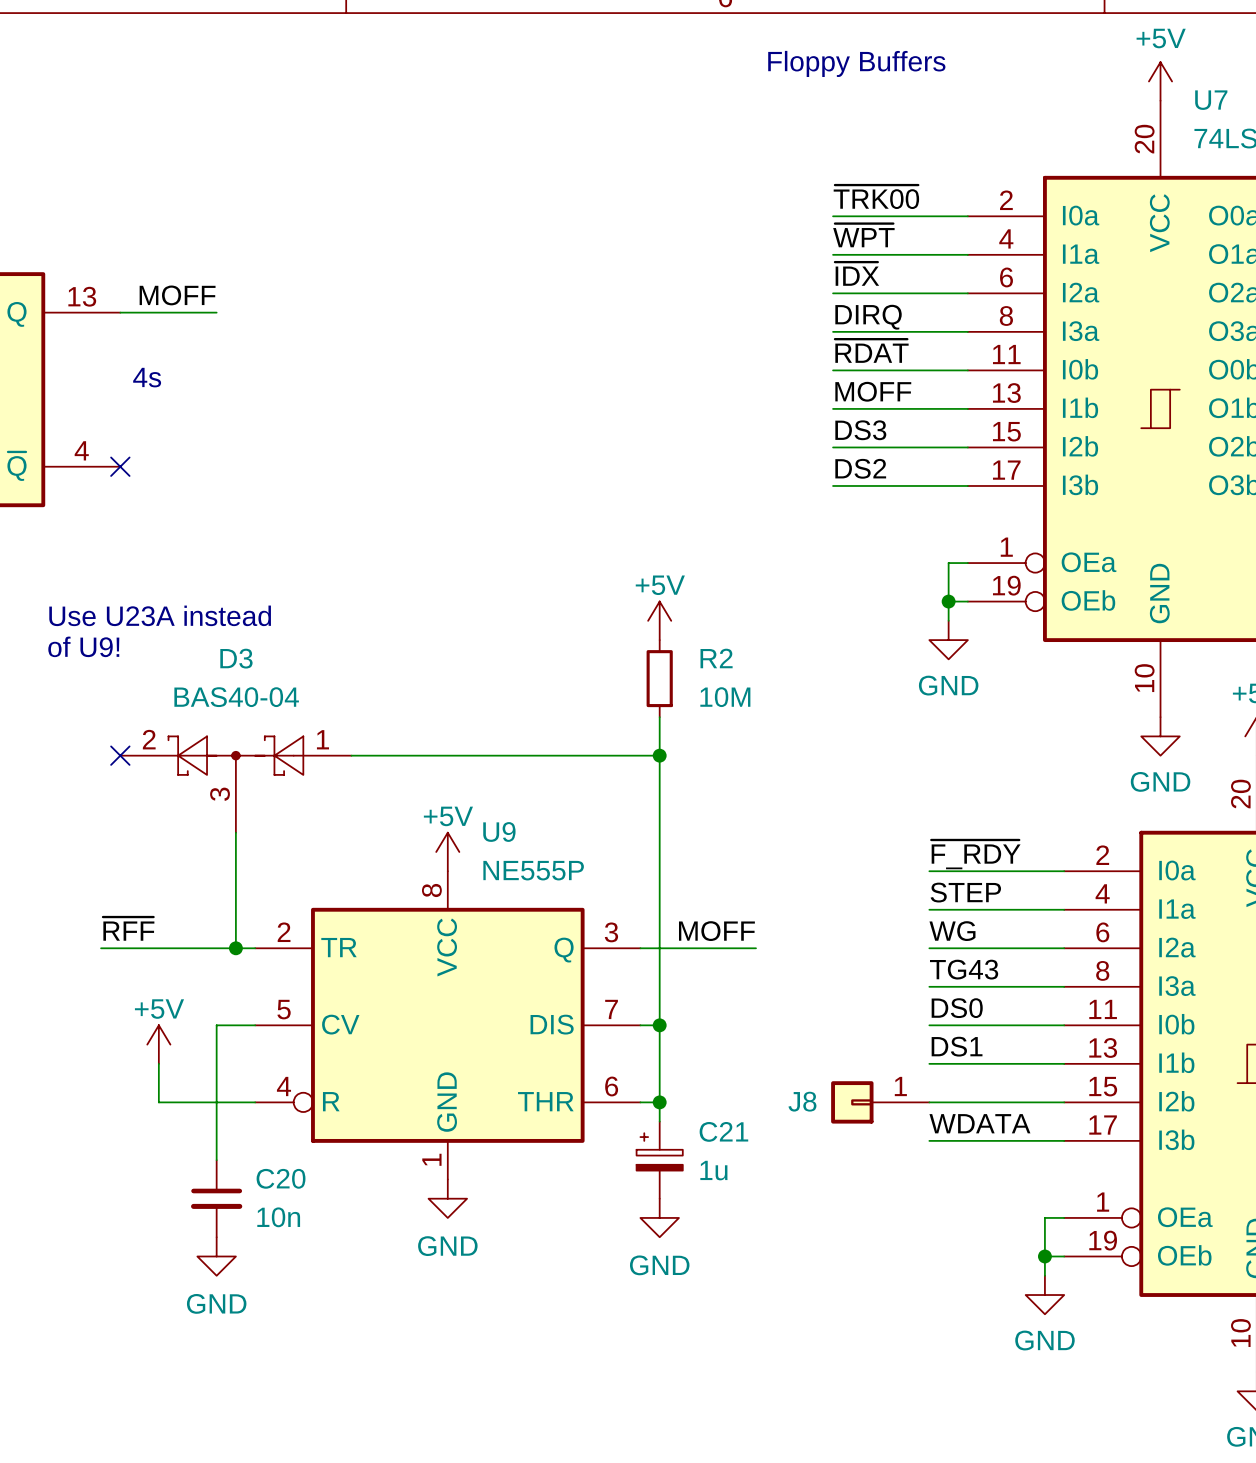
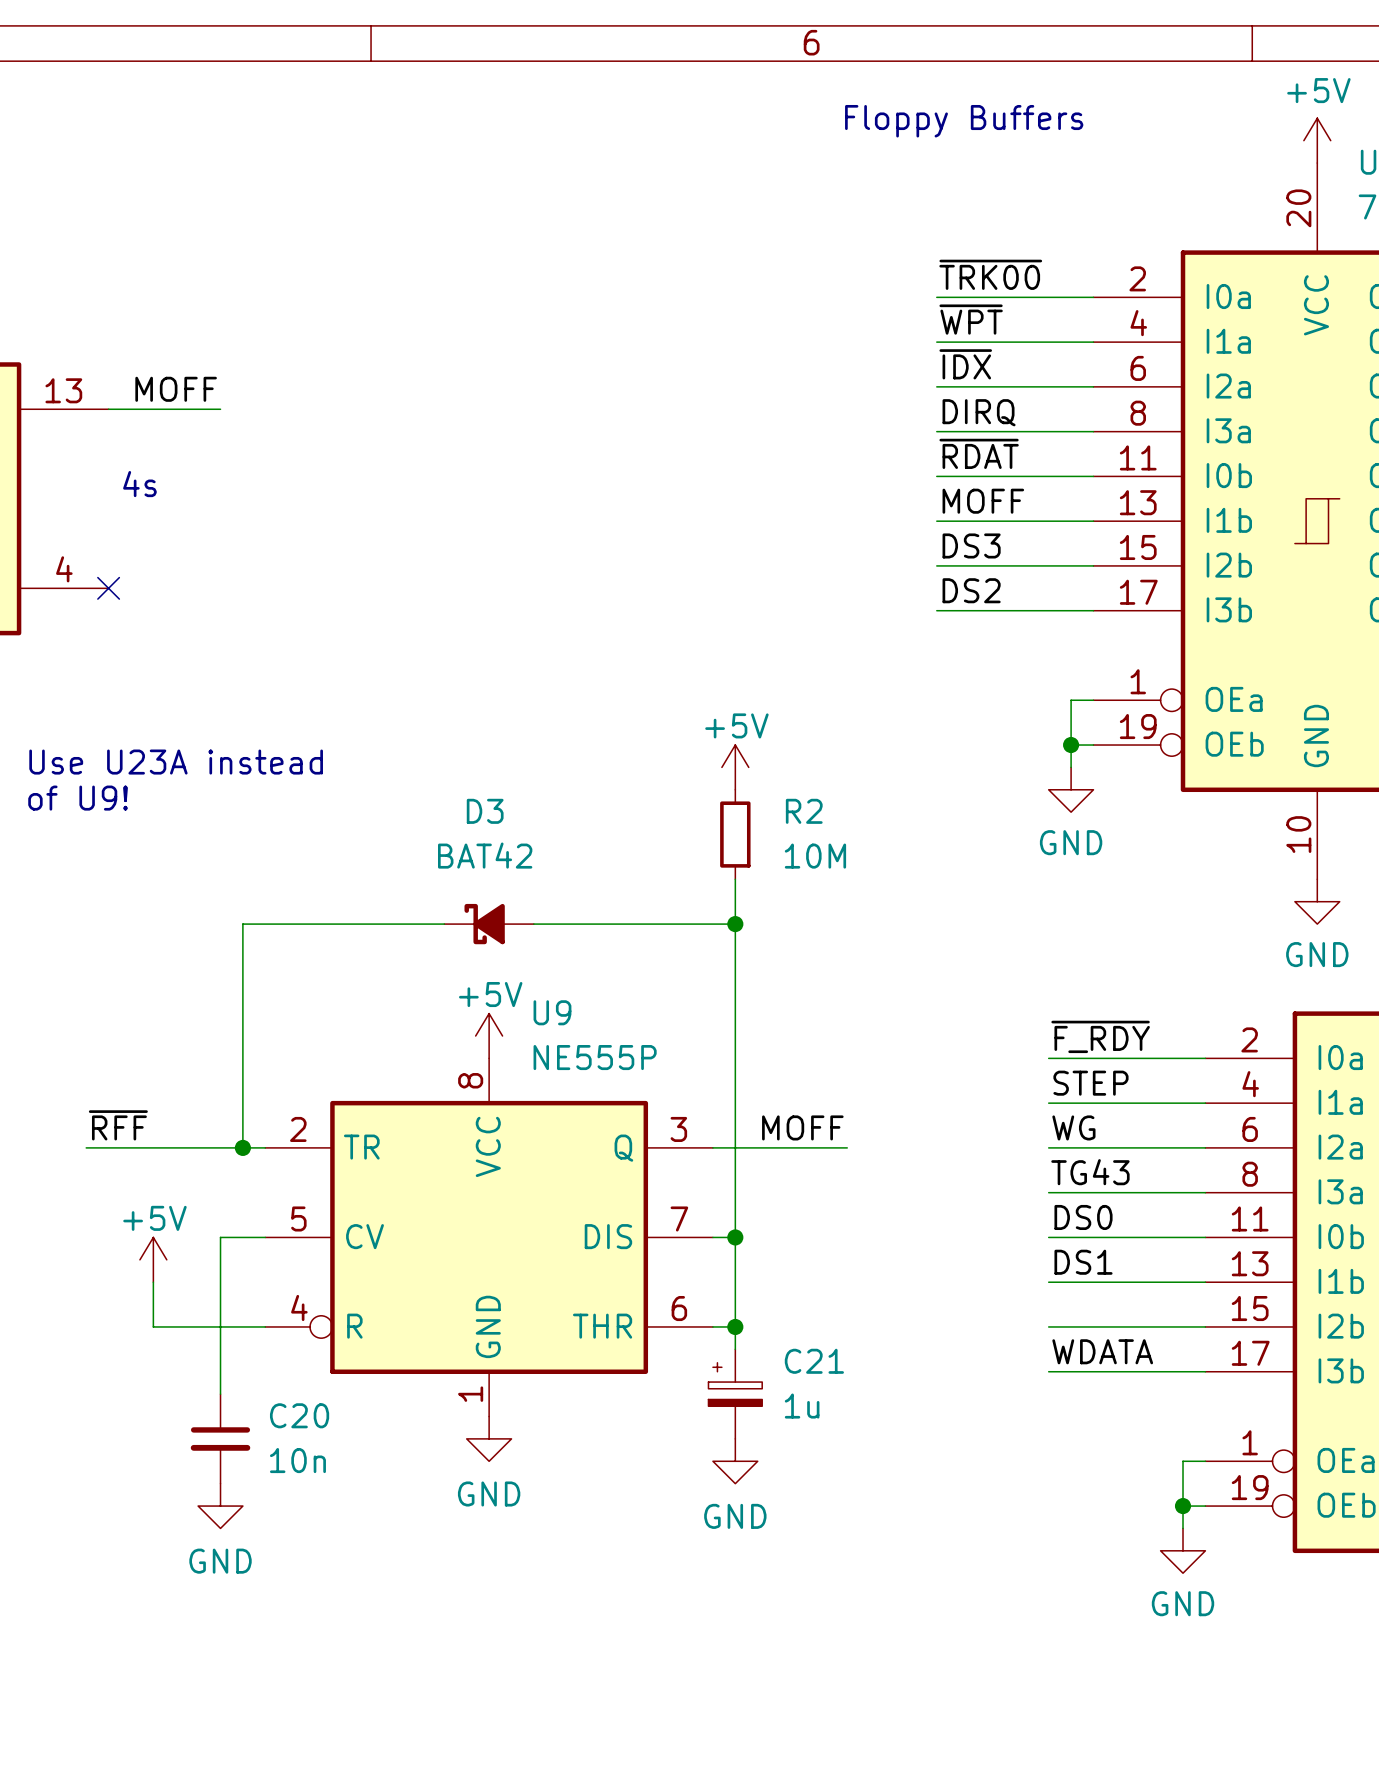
D3 value: BAS40-04 (236, 697) -> BAT42 (485, 855)
D3 symbol: [120, 736, 352, 833] -> [444, 903, 534, 945]
no-connect mark: (120, 755) -> none
J8: (880, 1102) -> none

